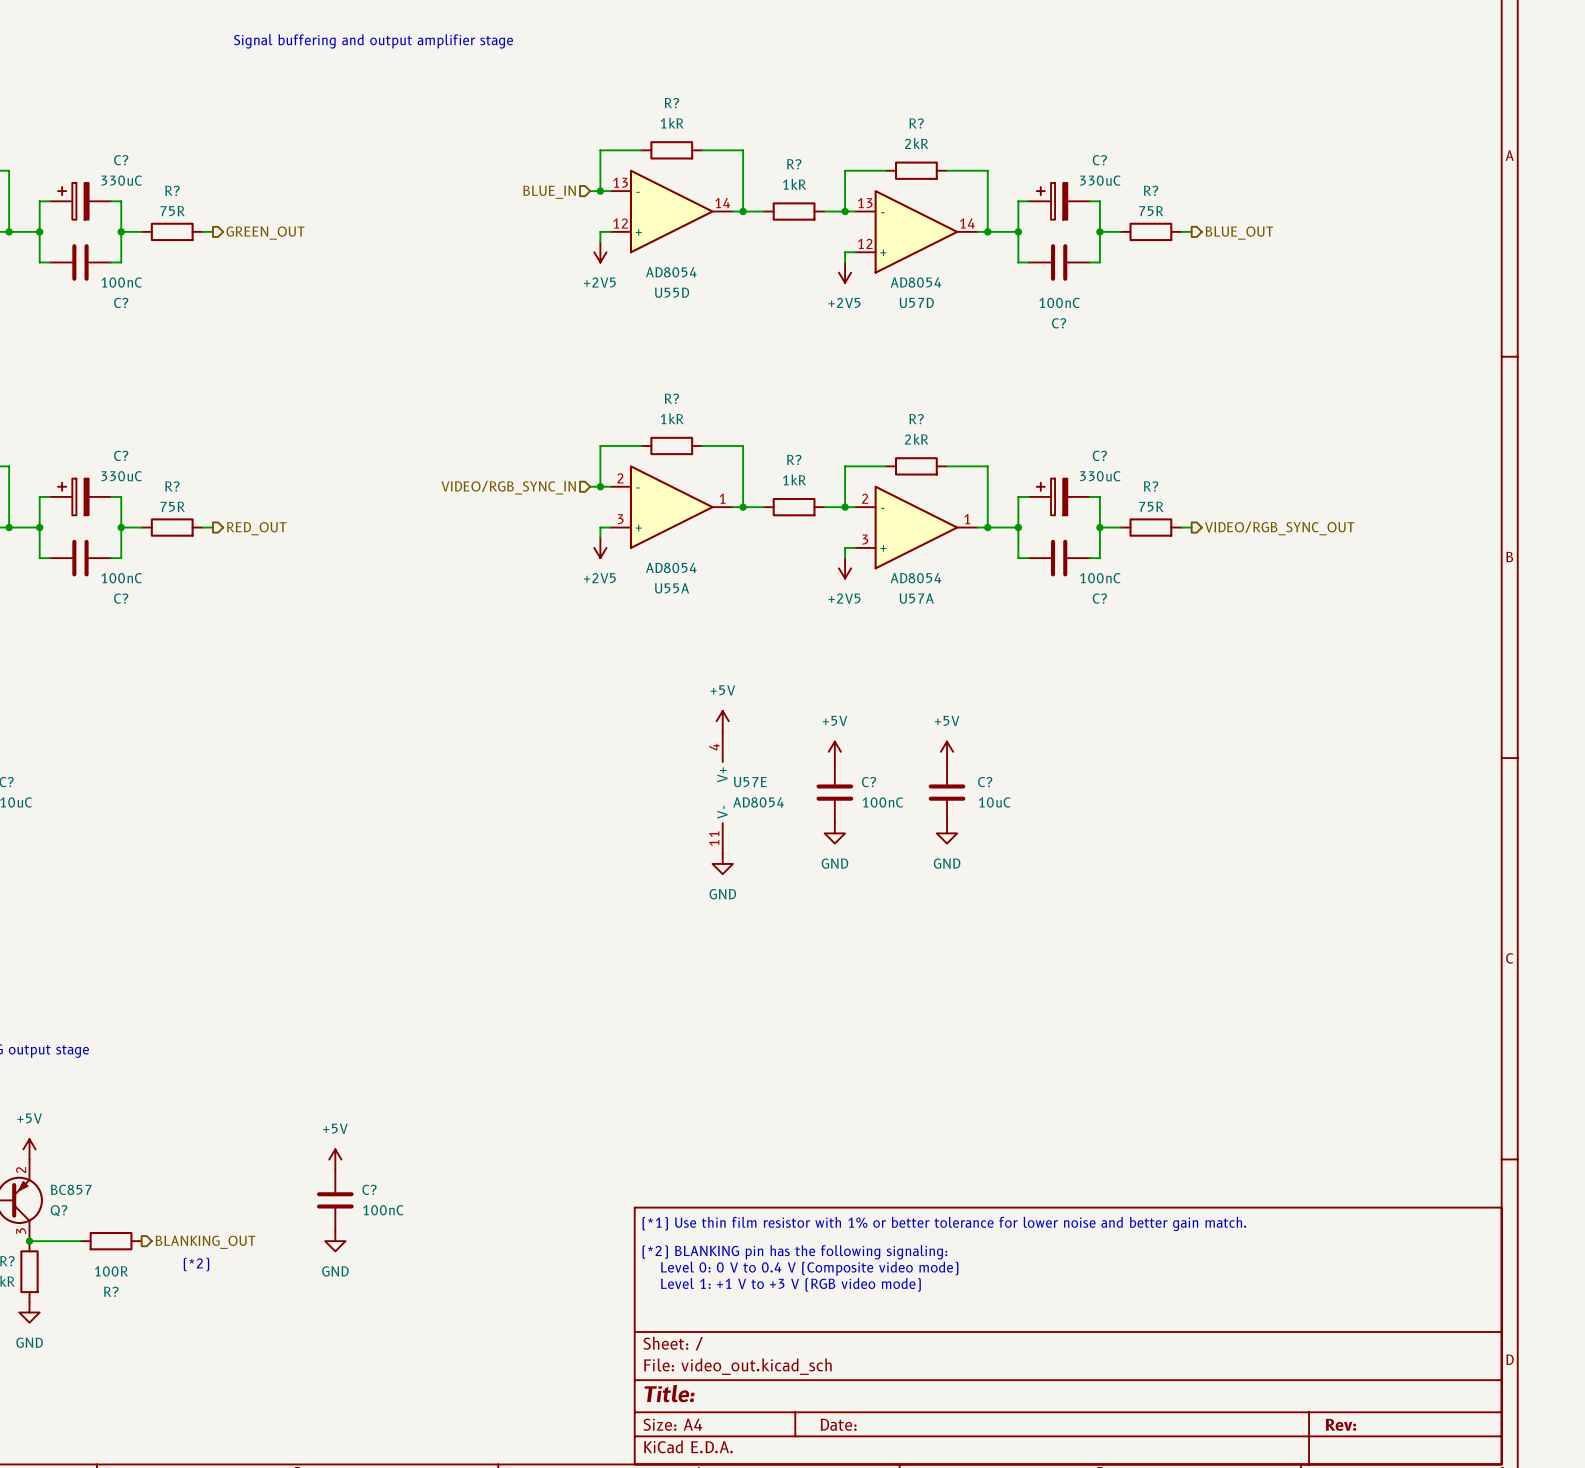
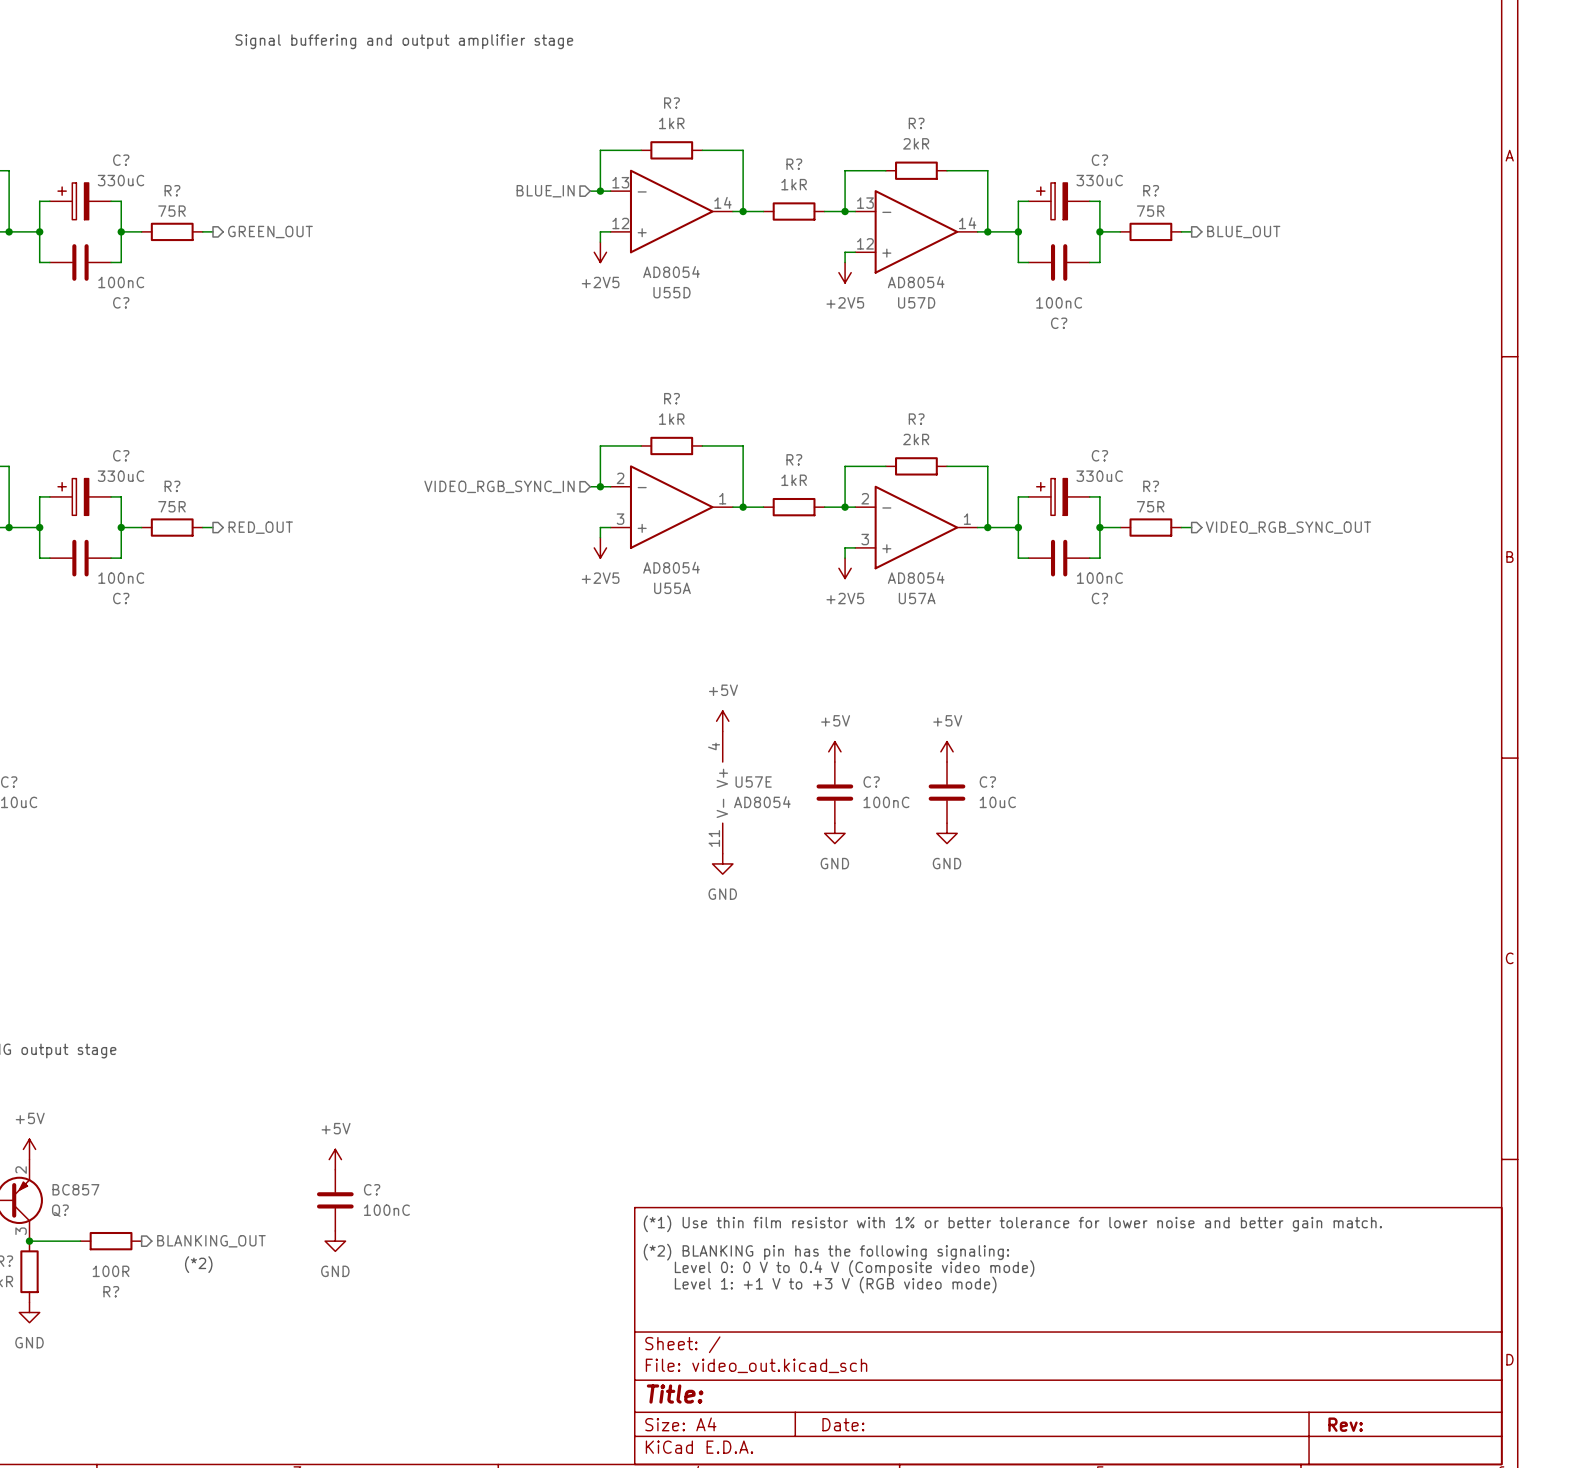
hierarchical label: VIDEO/RGB_SYNC_IN (508, 487) -> VIDEO_RGB_SYNC_IN (499, 486)
hierarchical label: VIDEO/RGB_SYNC_OUT (1279, 528) -> VIDEO_RGB_SYNC_OUT (1288, 527)

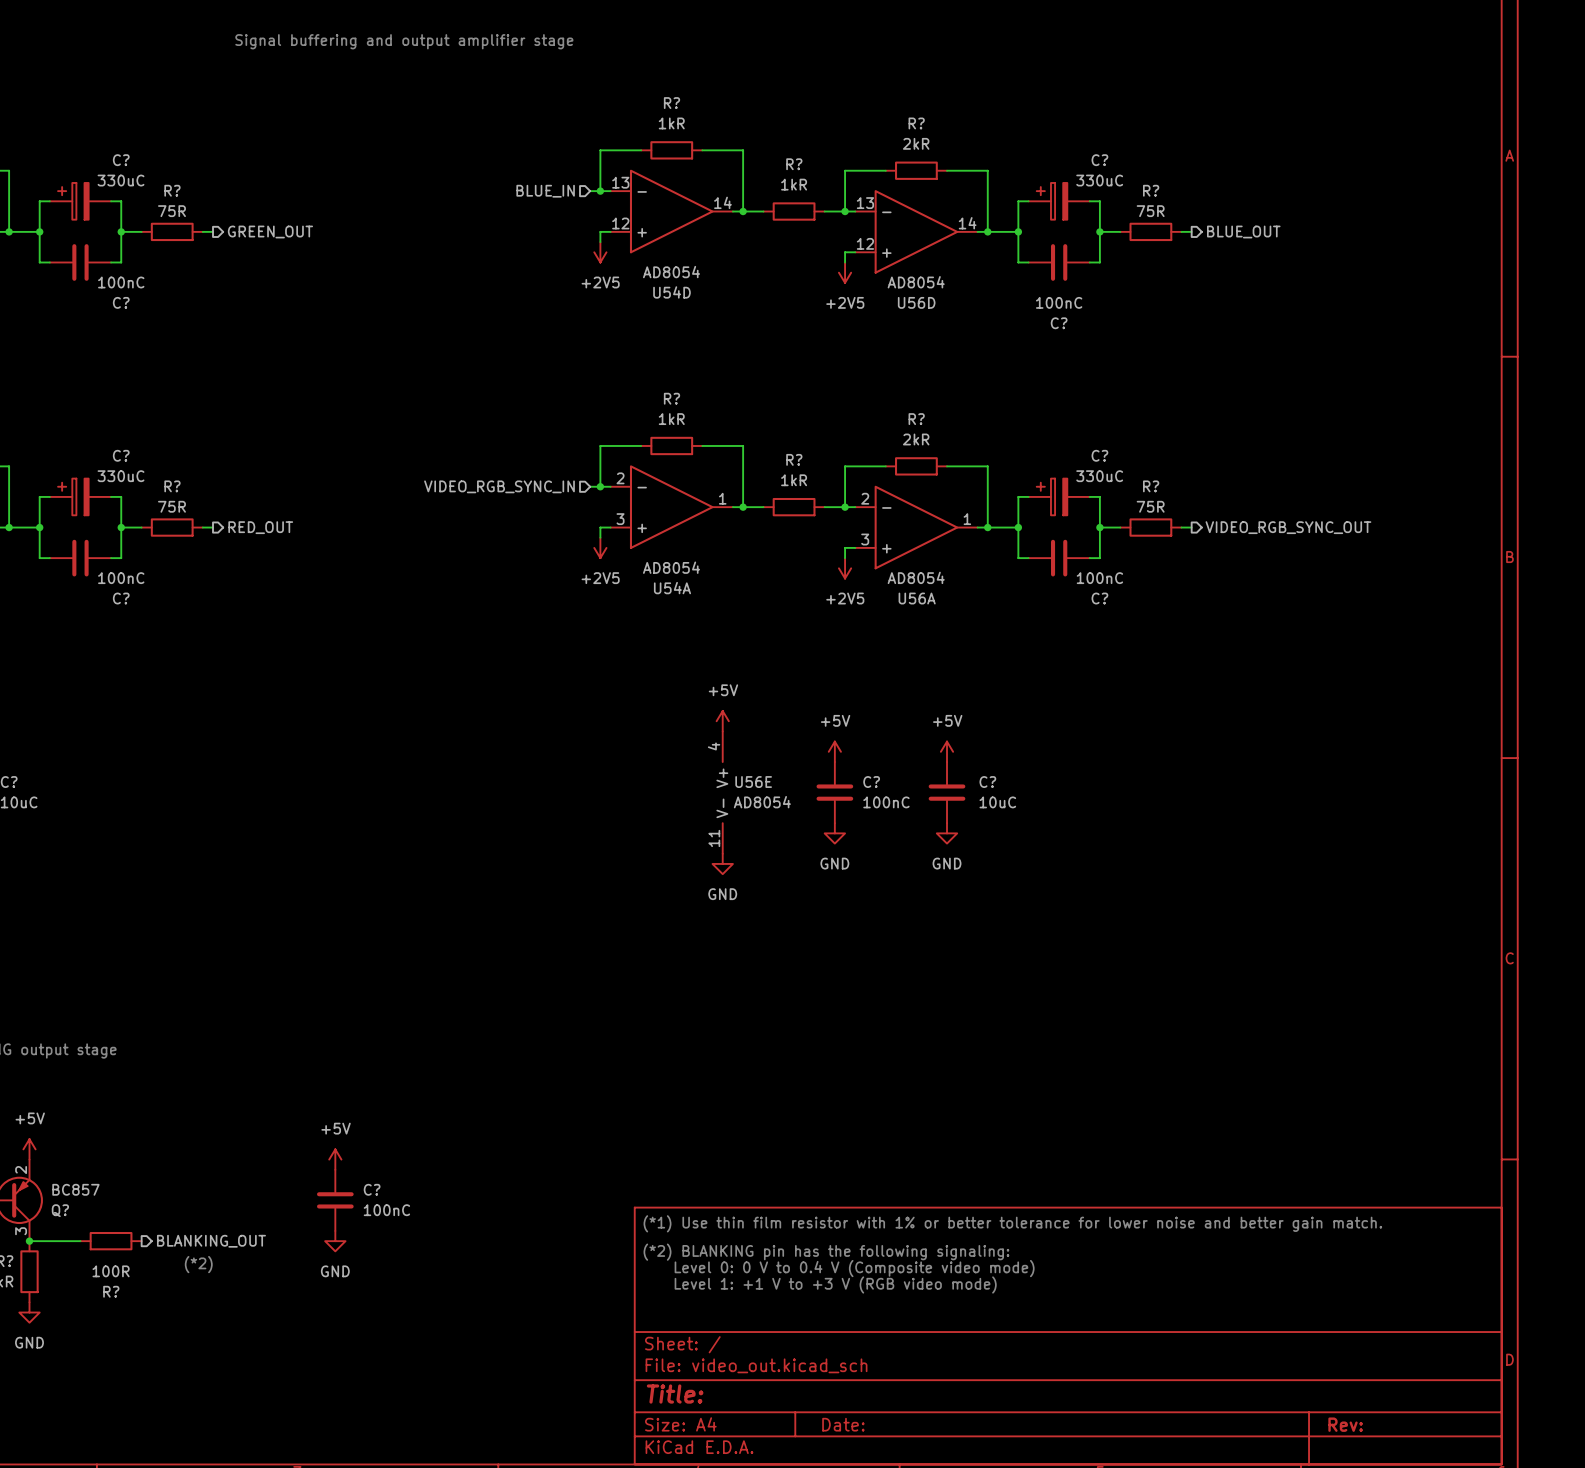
U55D name: U55D (671, 292) -> U54D (671, 292)
U57D name: U57D (916, 302) -> U56D (916, 302)
U55A name: U55A (672, 588) -> U54A (672, 588)
U57A name: U57A (917, 598) -> U56A (917, 598)
U57E name: U57E (753, 782) -> U56E (753, 782)

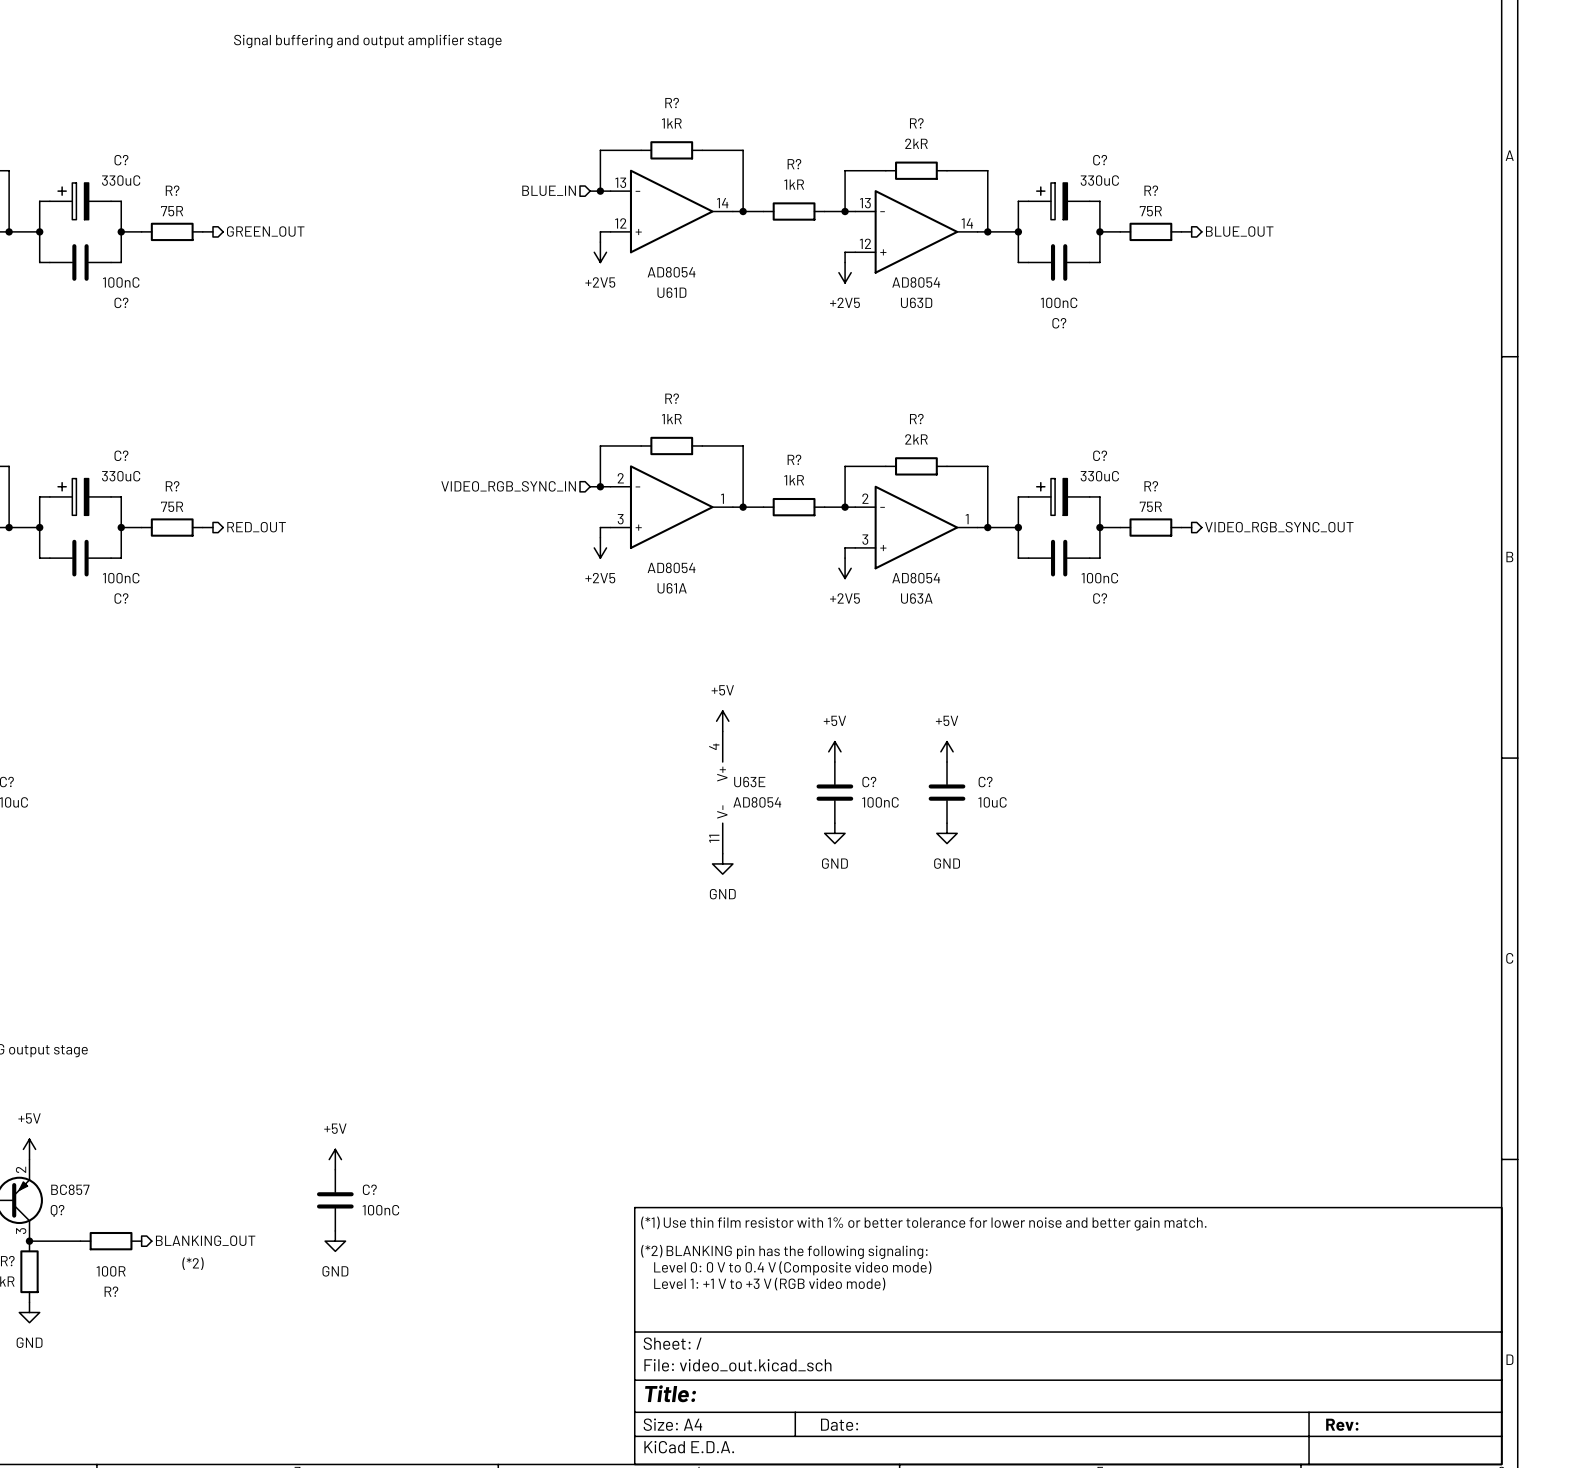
U54D name: U54D (671, 292) -> U61D (671, 292)
U56D name: U56D (916, 302) -> U63D (916, 302)
U54A name: U54A (672, 588) -> U61A (672, 588)
U56A name: U56A (917, 598) -> U63A (916, 598)
U56E name: U56E (753, 782) -> U63E (749, 782)

